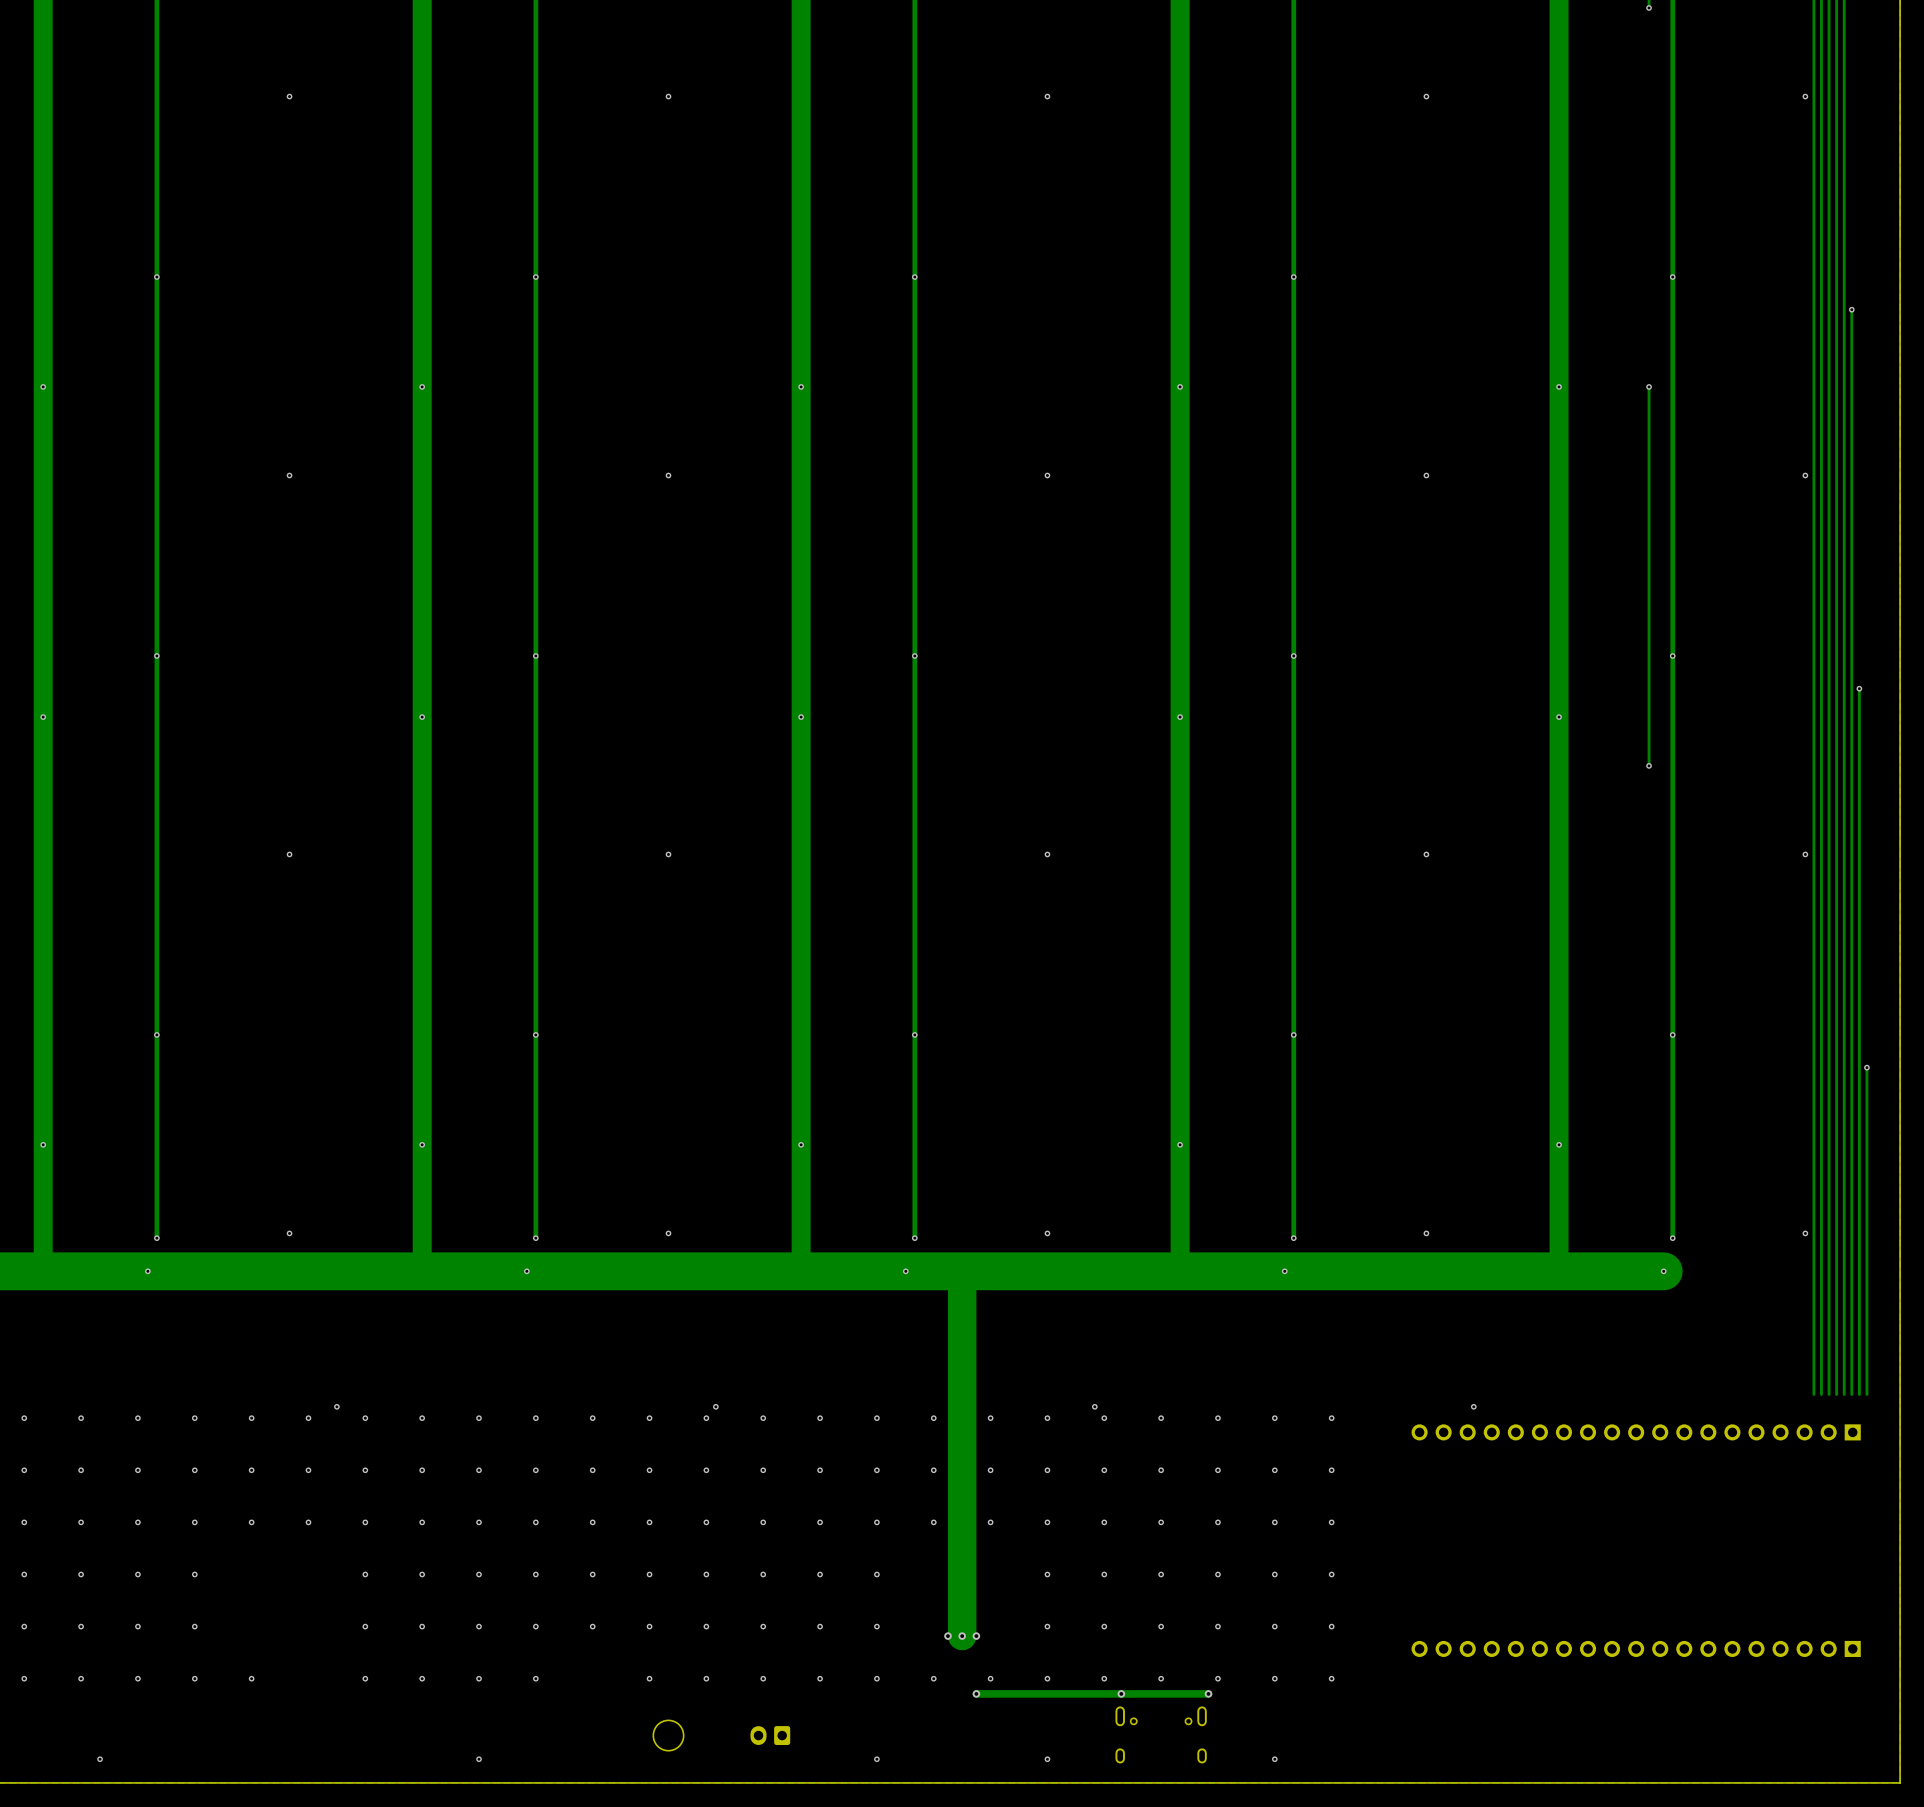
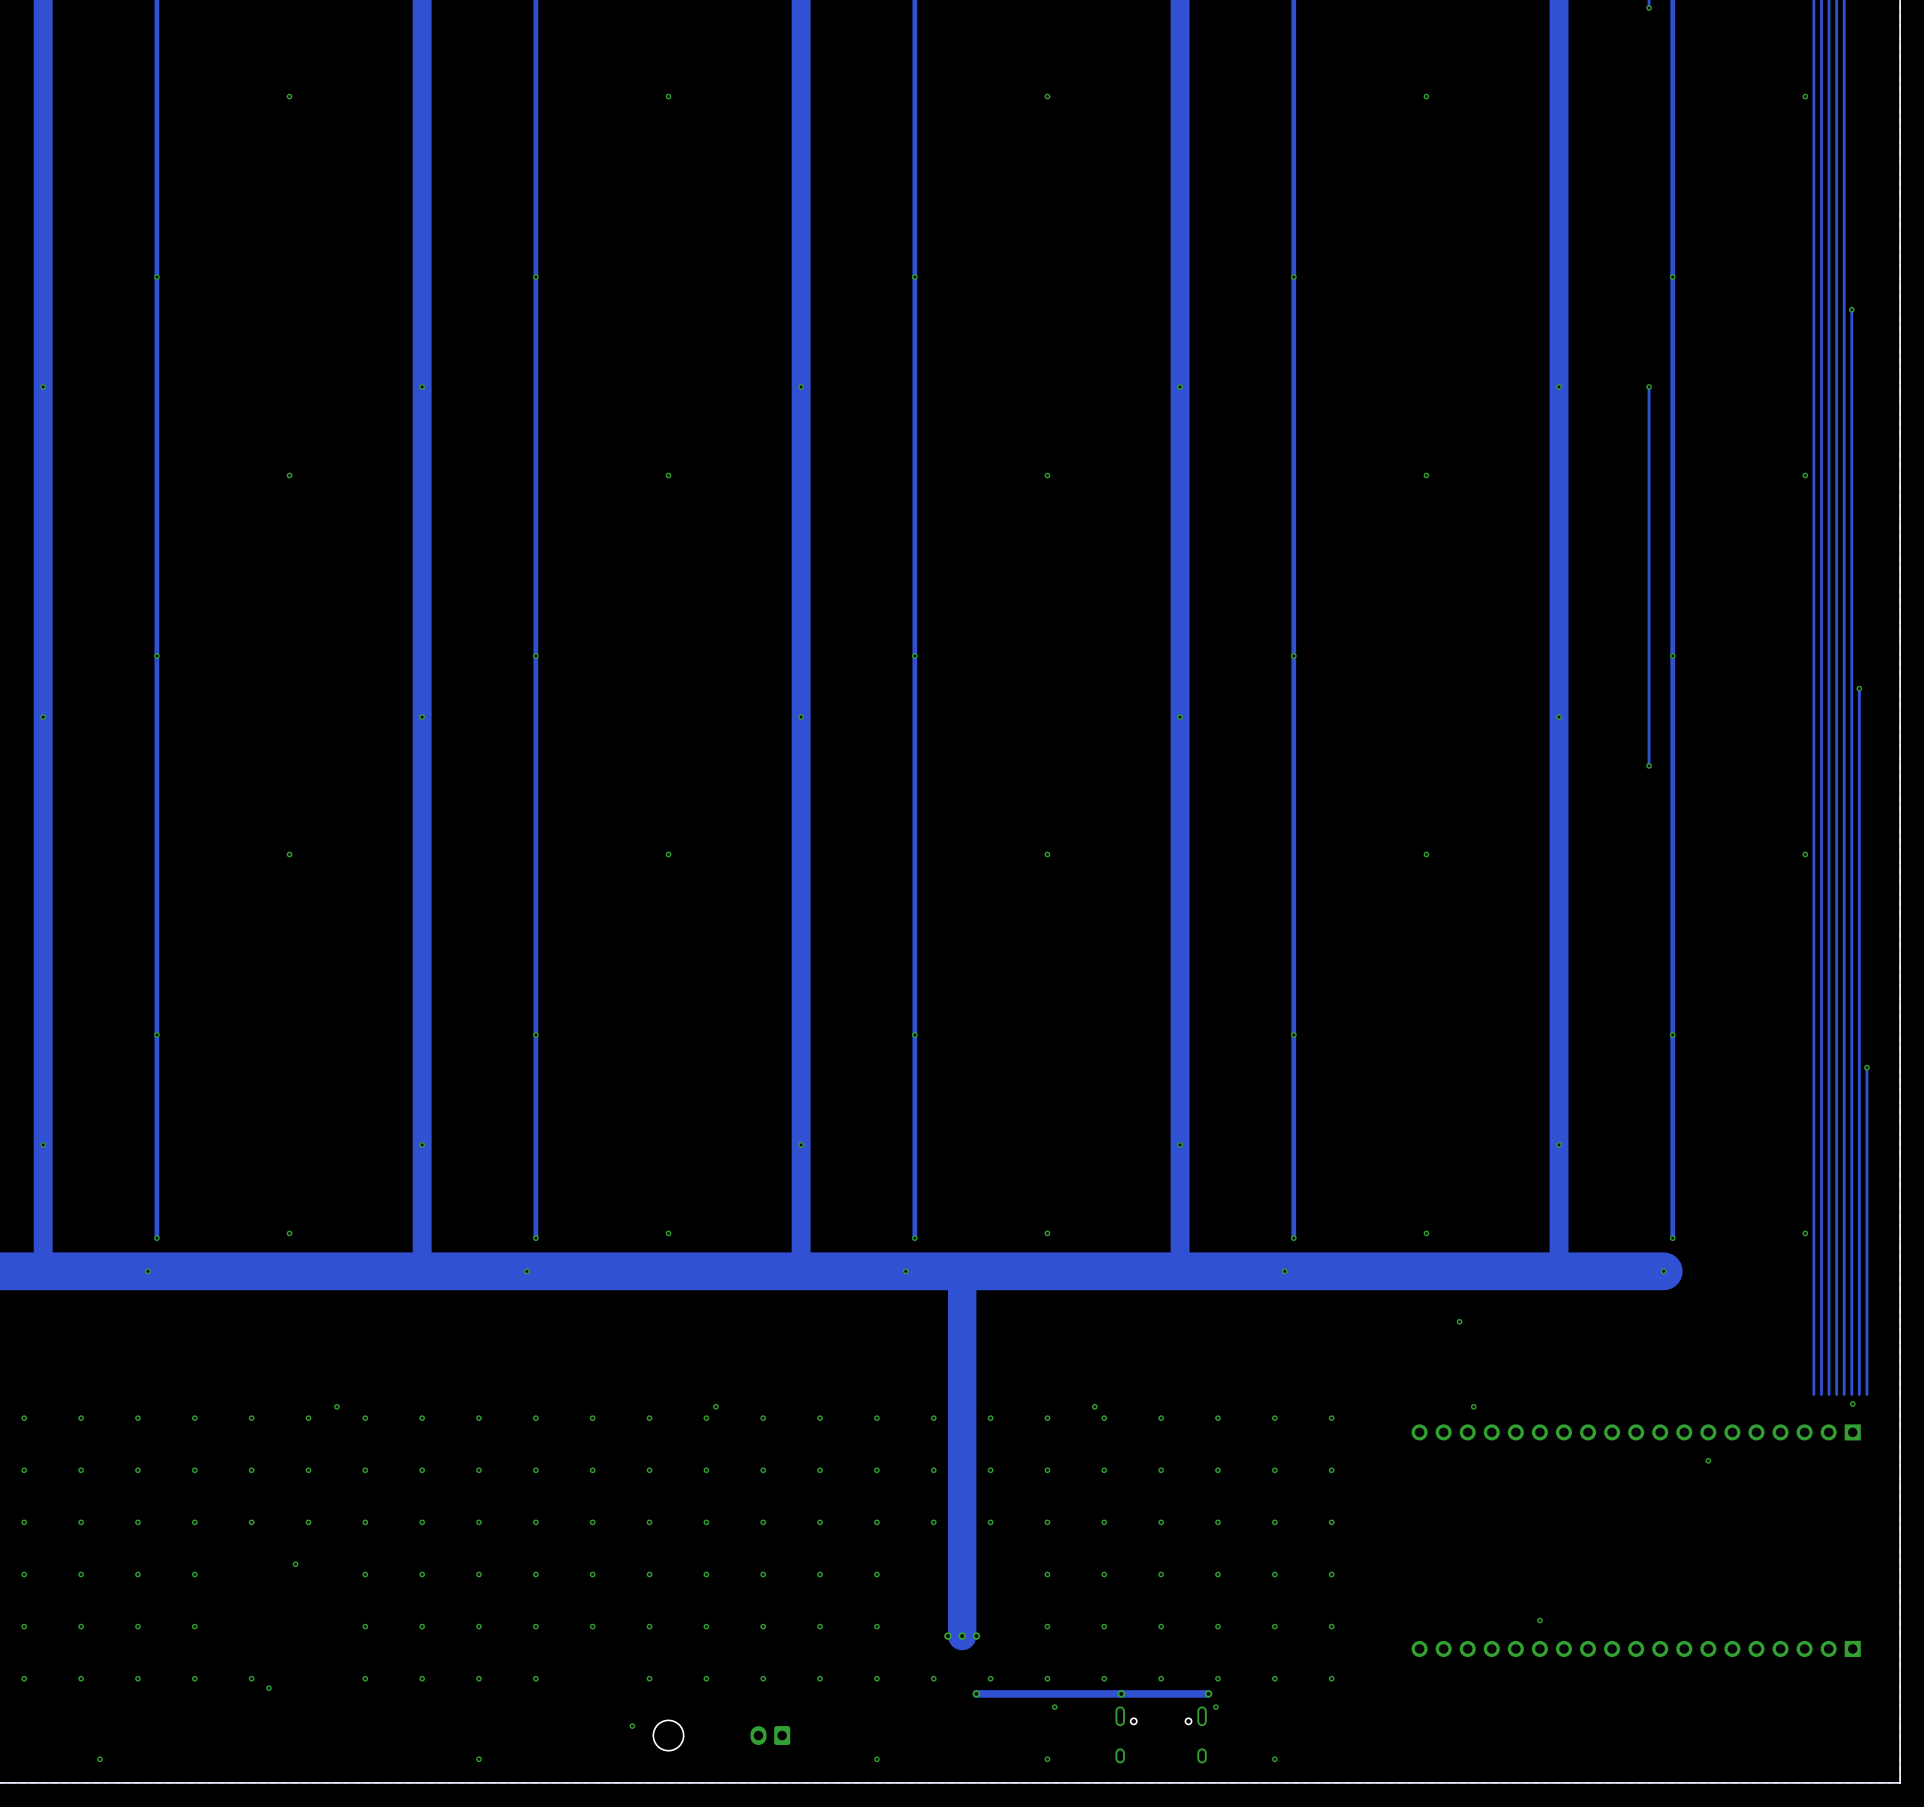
via: none -> (1459, 1321)
via: none -> (1852, 1403)
via: none -> (1708, 1460)
via: none -> (295, 1564)
via: none -> (1539, 1620)
via: none -> (268, 1688)
via: none -> (1054, 1707)
via: none -> (1215, 1707)
via: none -> (632, 1726)

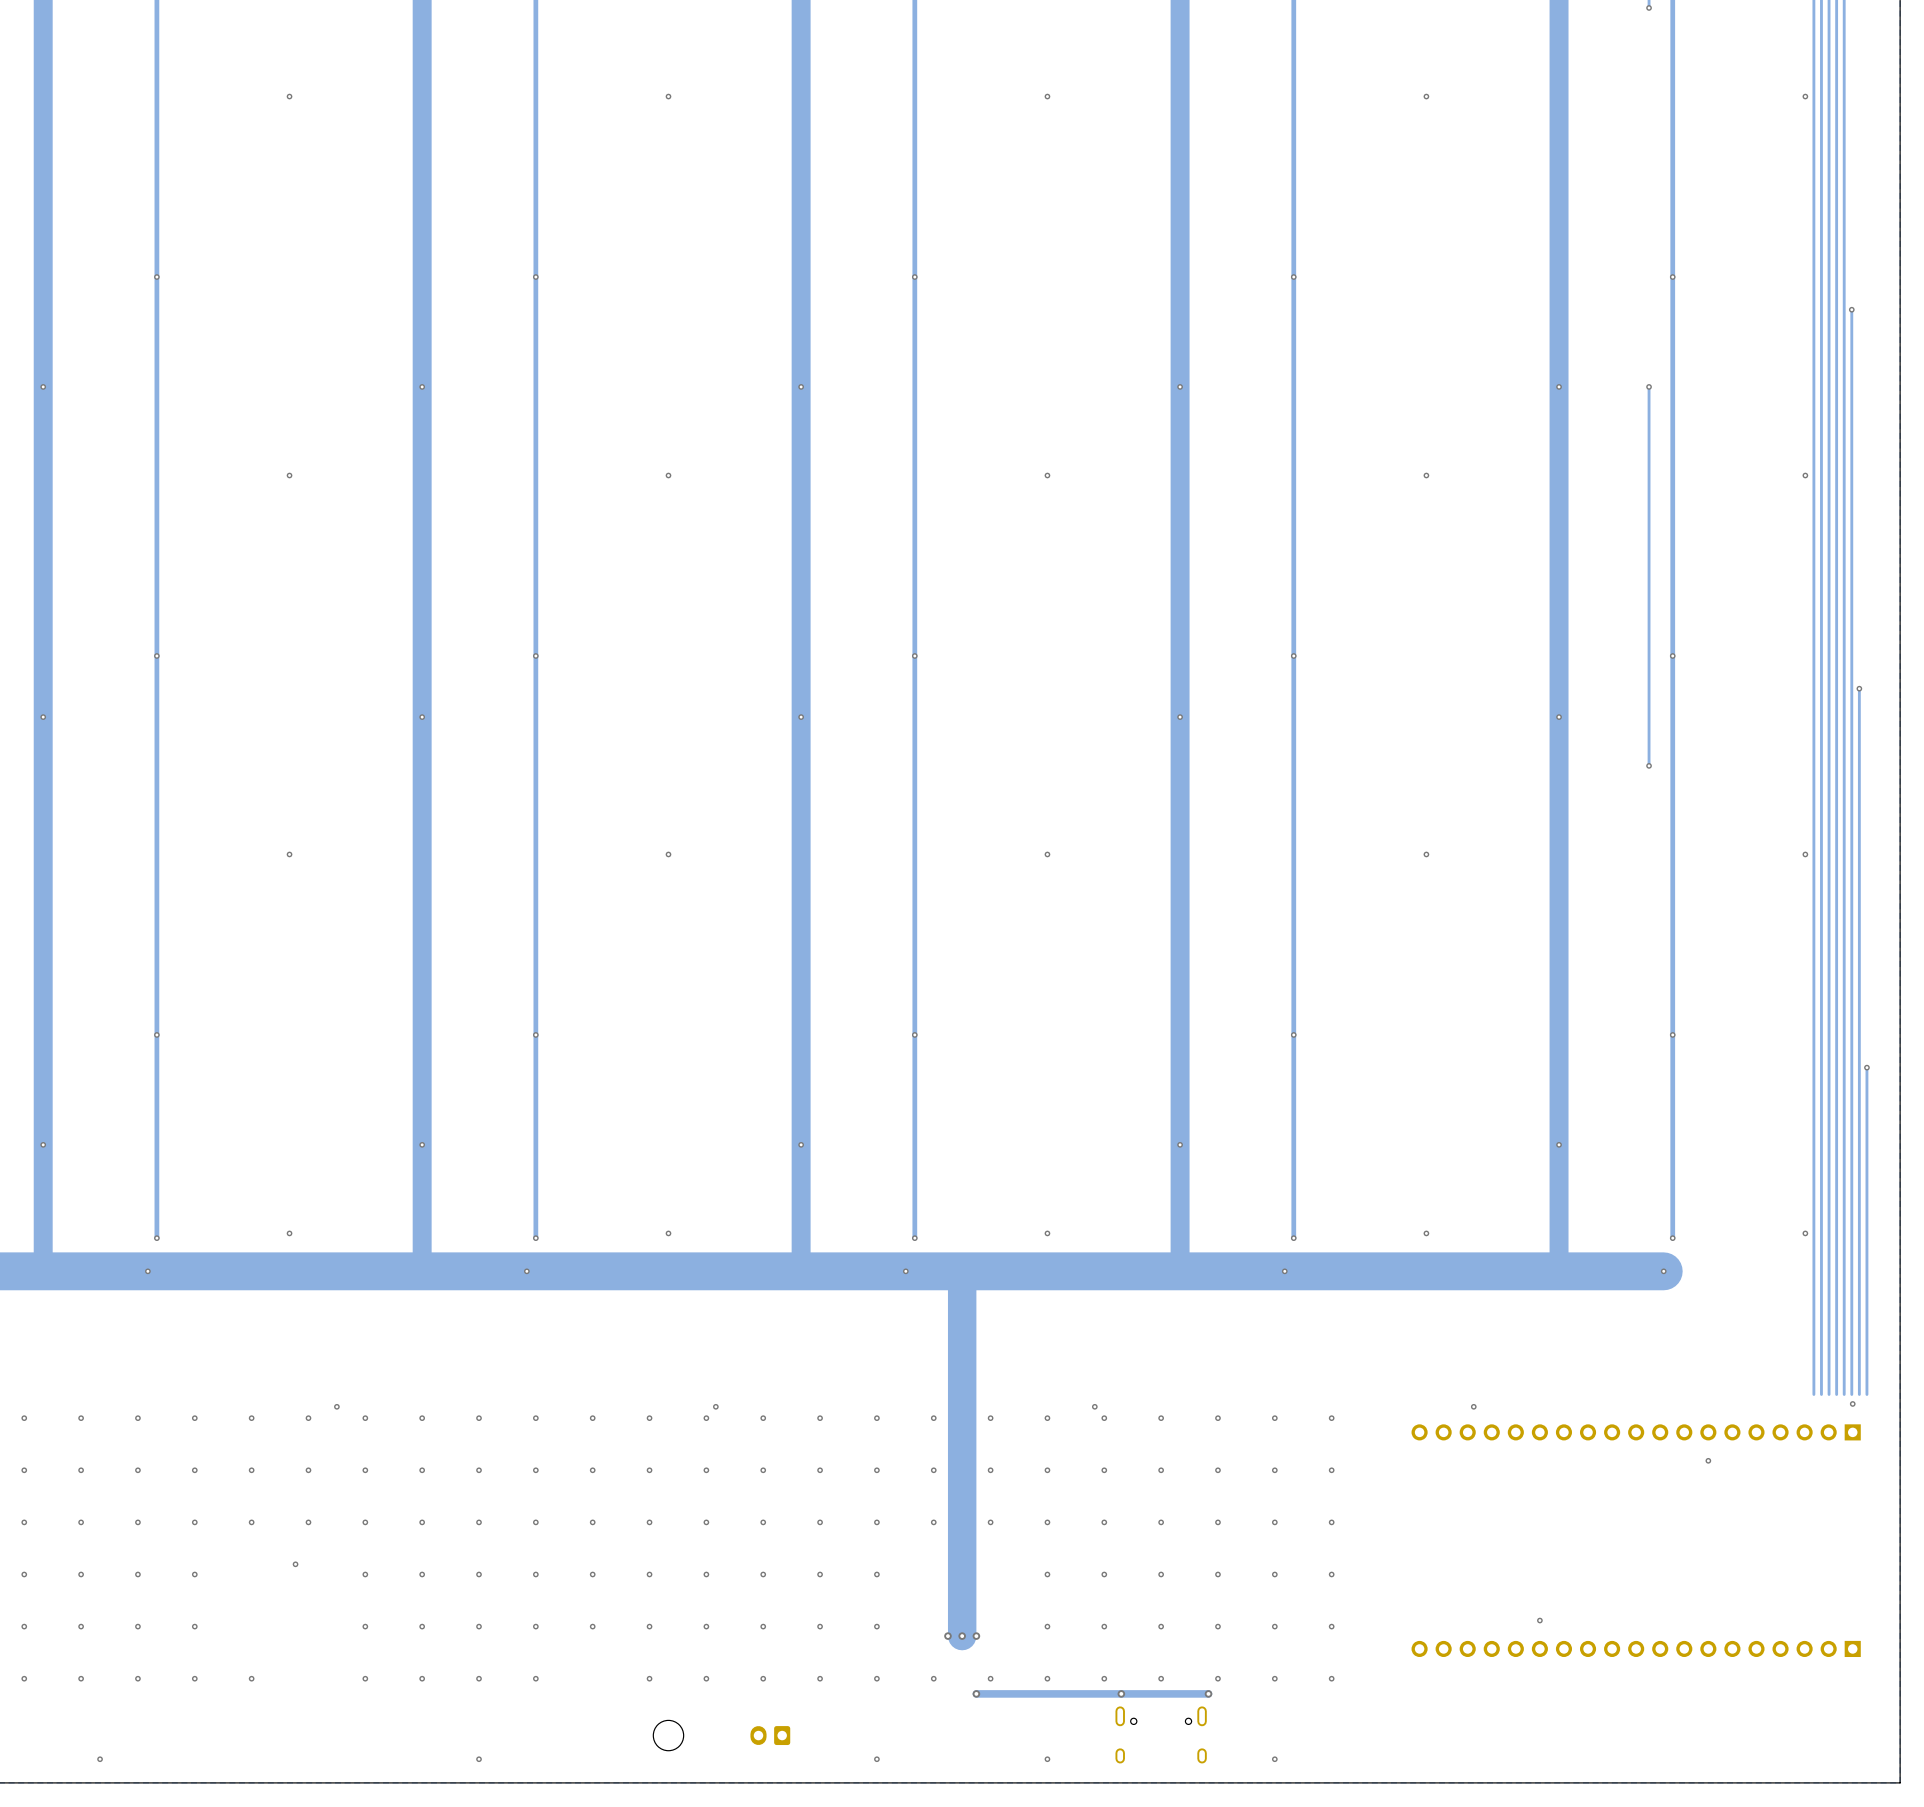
via: (1459, 1321) -> none
via: (268, 1688) -> none
via: (1054, 1707) -> none
via: (1215, 1707) -> none
via: (632, 1726) -> none

